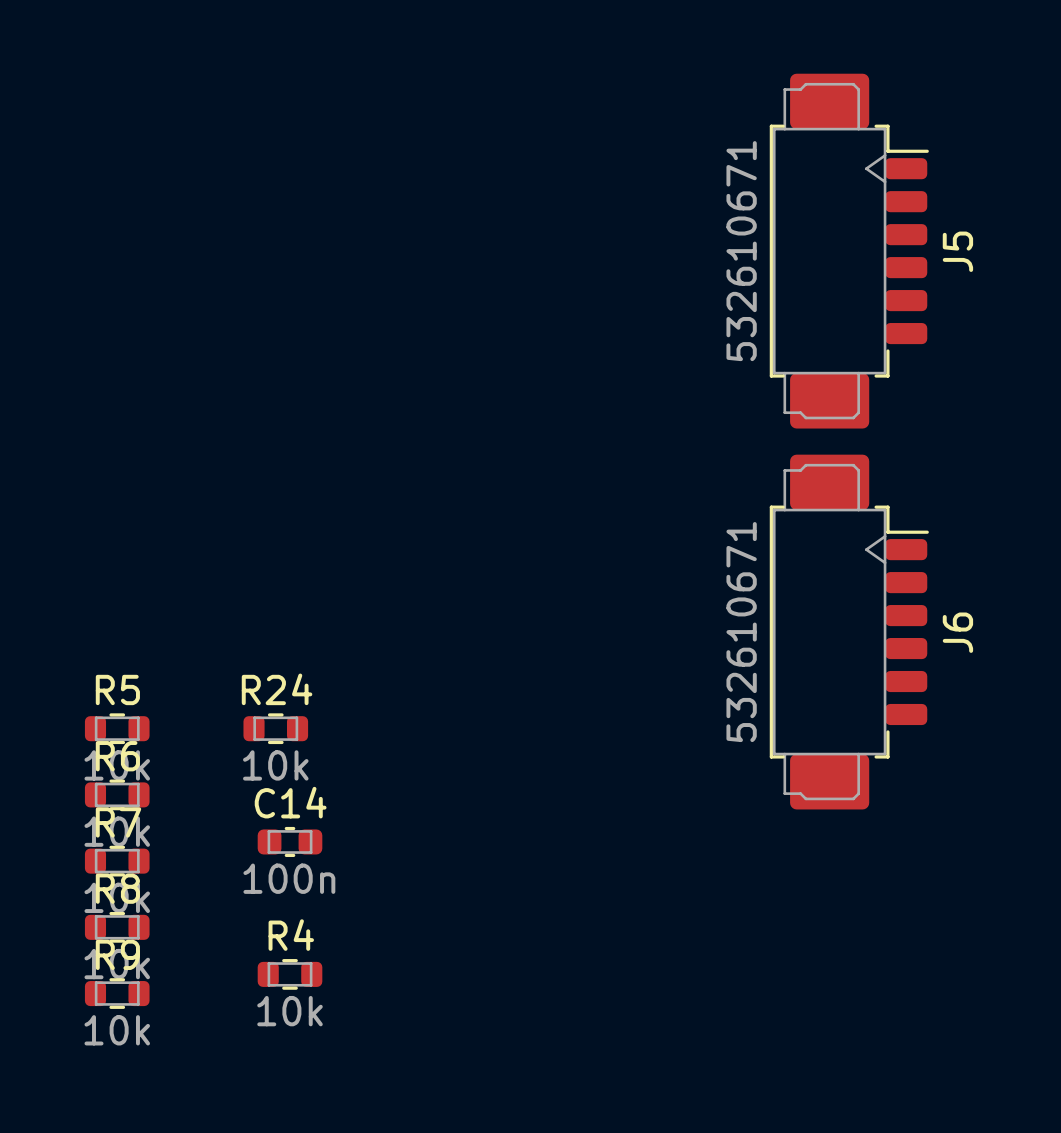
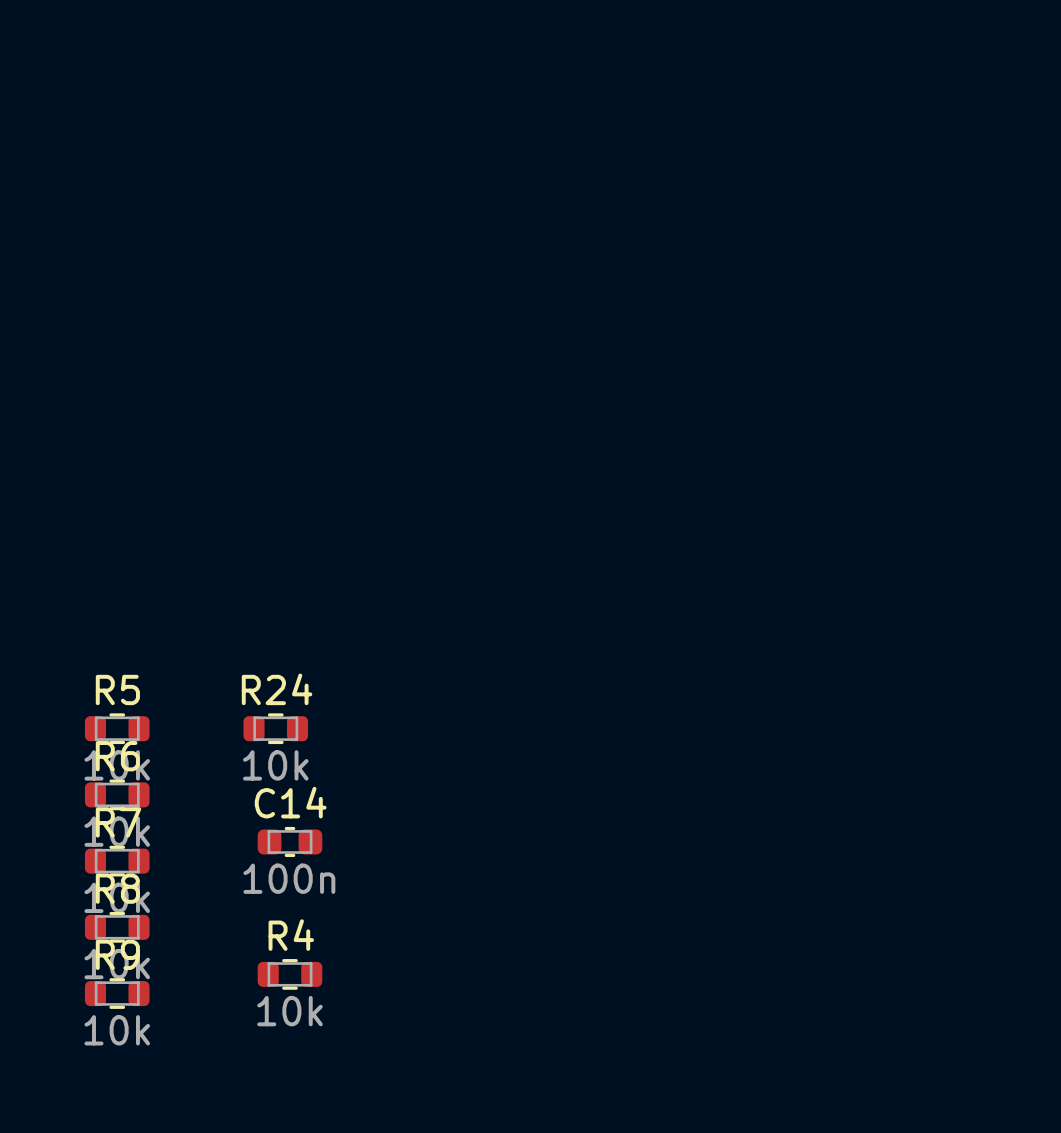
J5: 532610671 (849, 251) -> none
J6: 532610671 (849, 632) -> none

